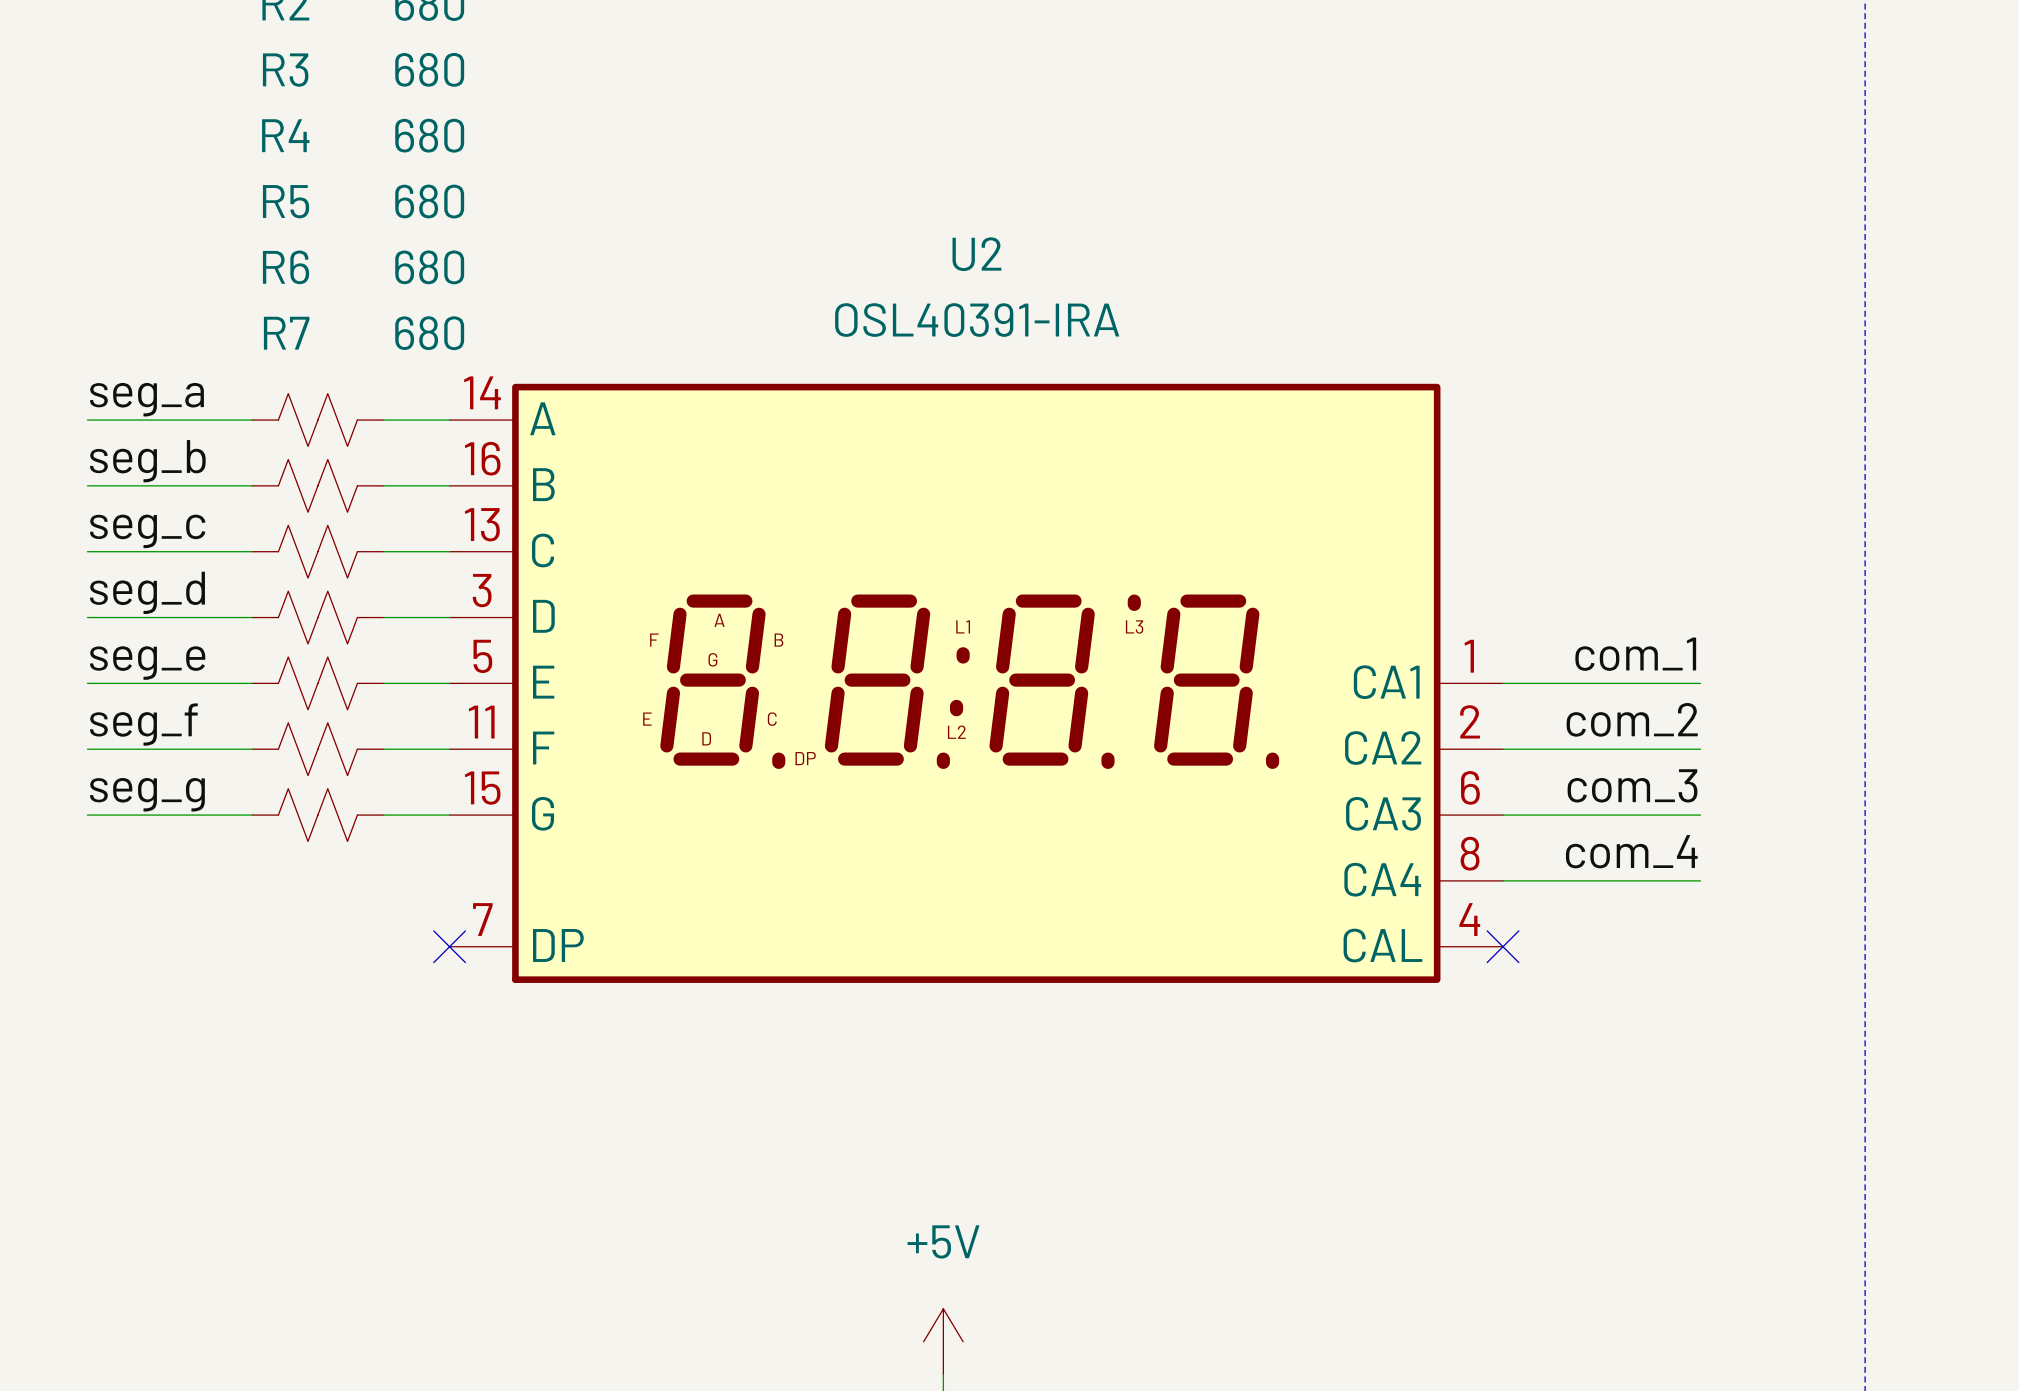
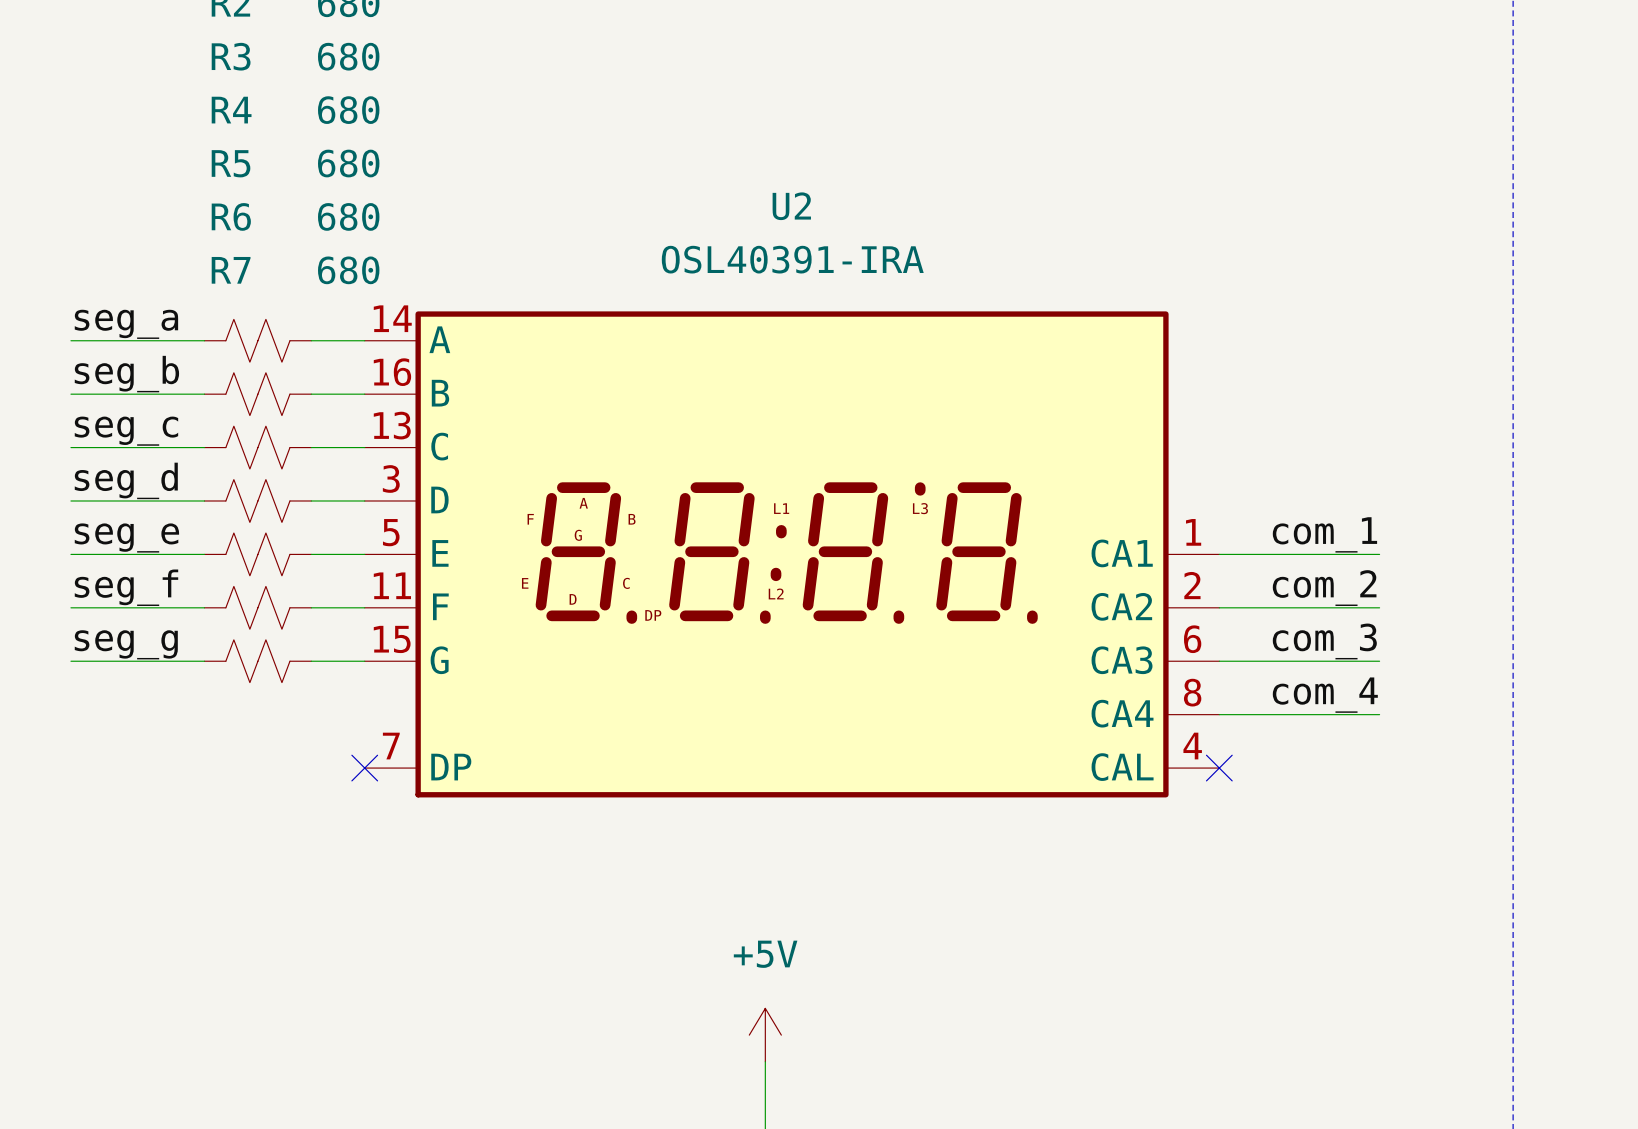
power symbol position: +5V (943, 1341) -> +5V (765, 1035)

